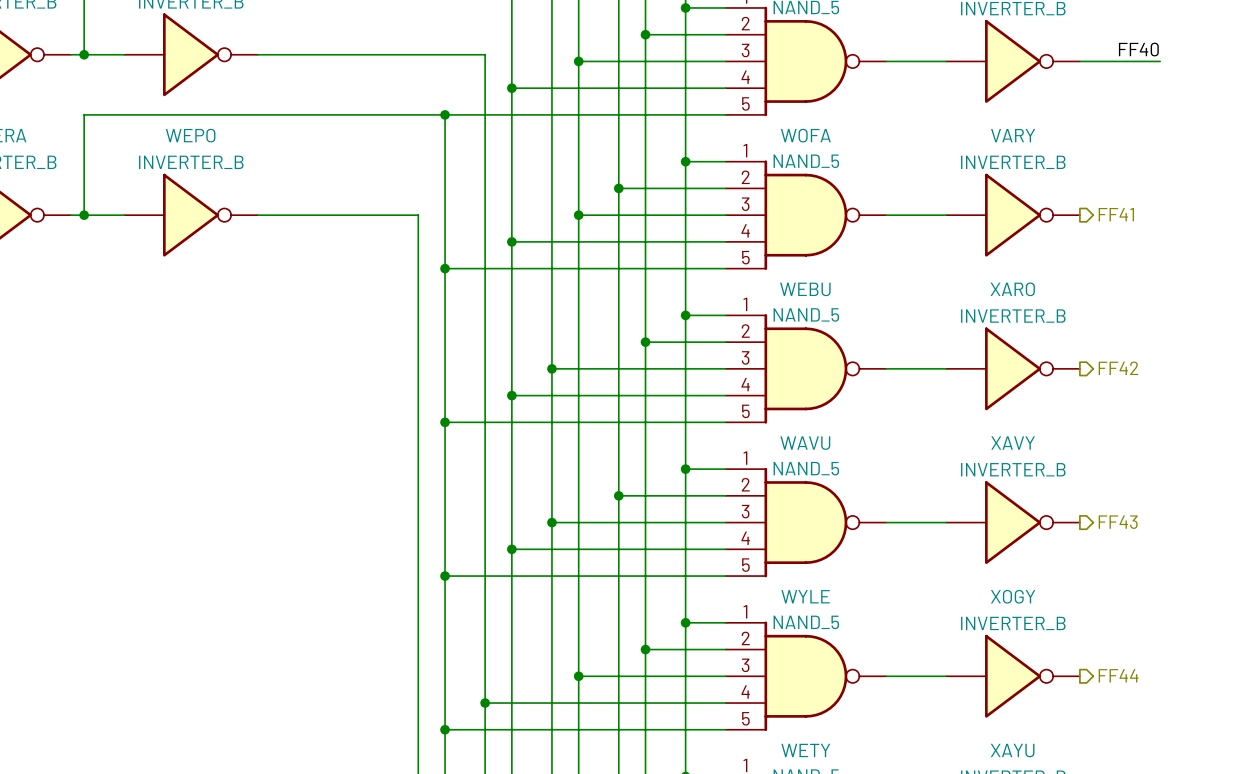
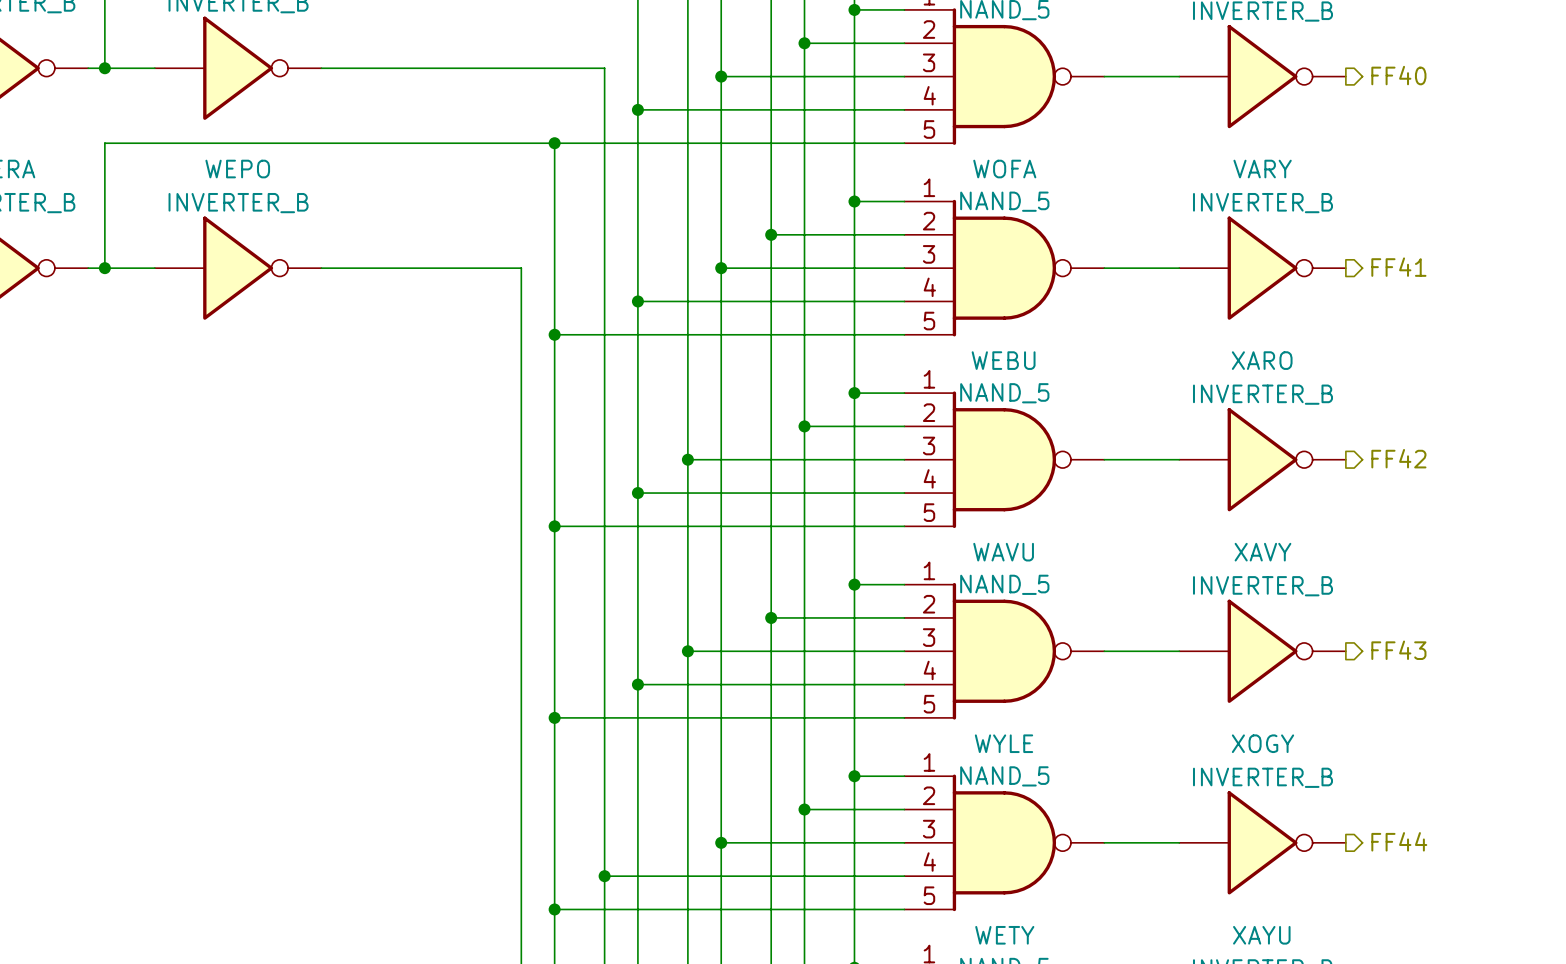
label: FF40 (1138, 49) -> none
hierarchical label: none -> FF40 (1398, 75)
wire: (1079, 61) (1160, 61) -> none

